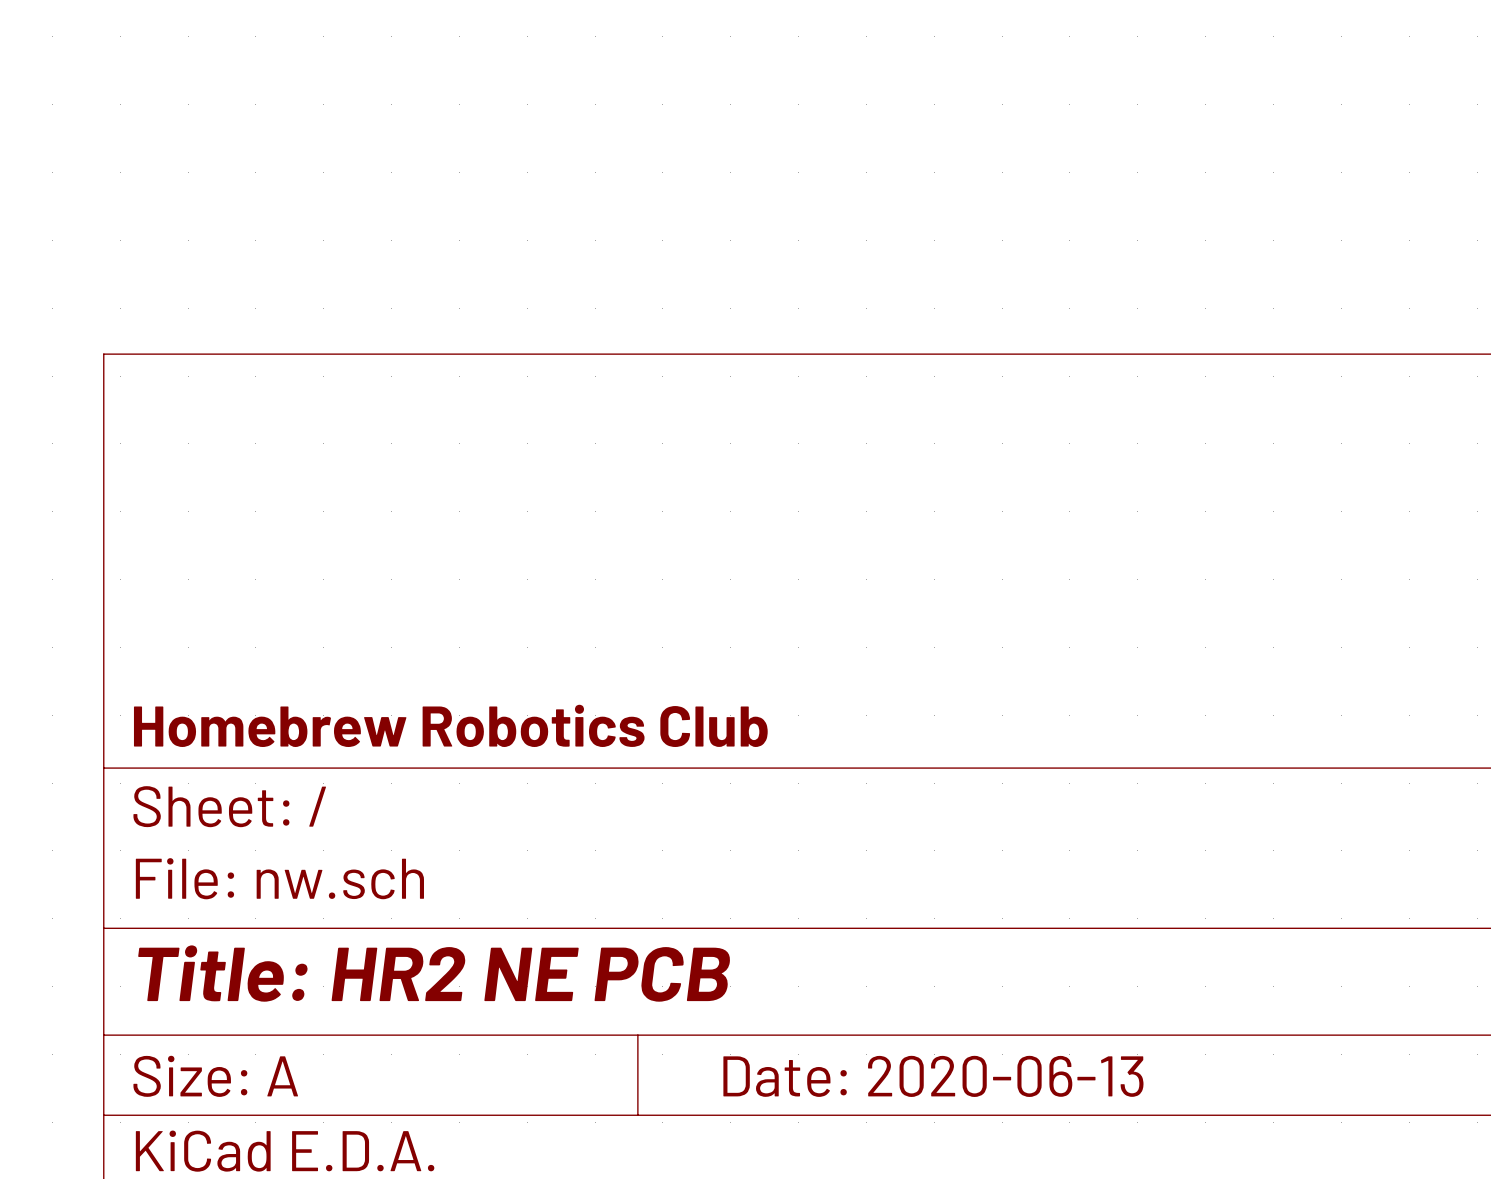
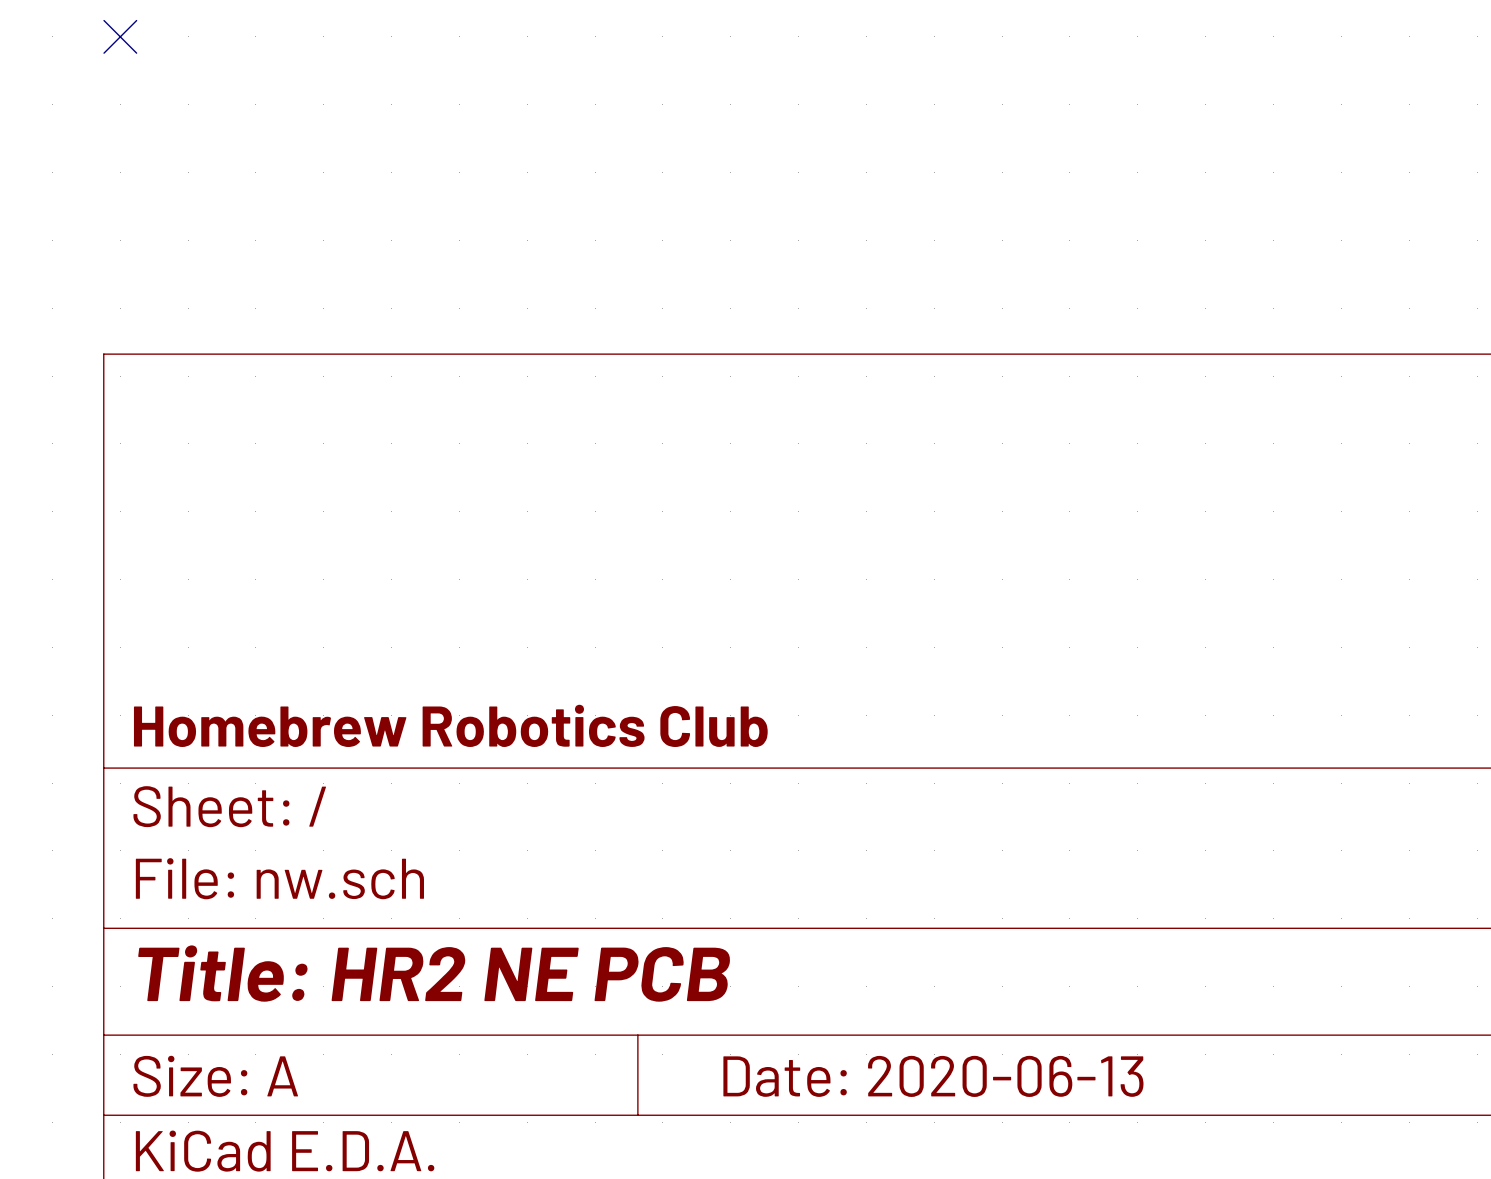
no-connect mark: none -> (120, 36)

